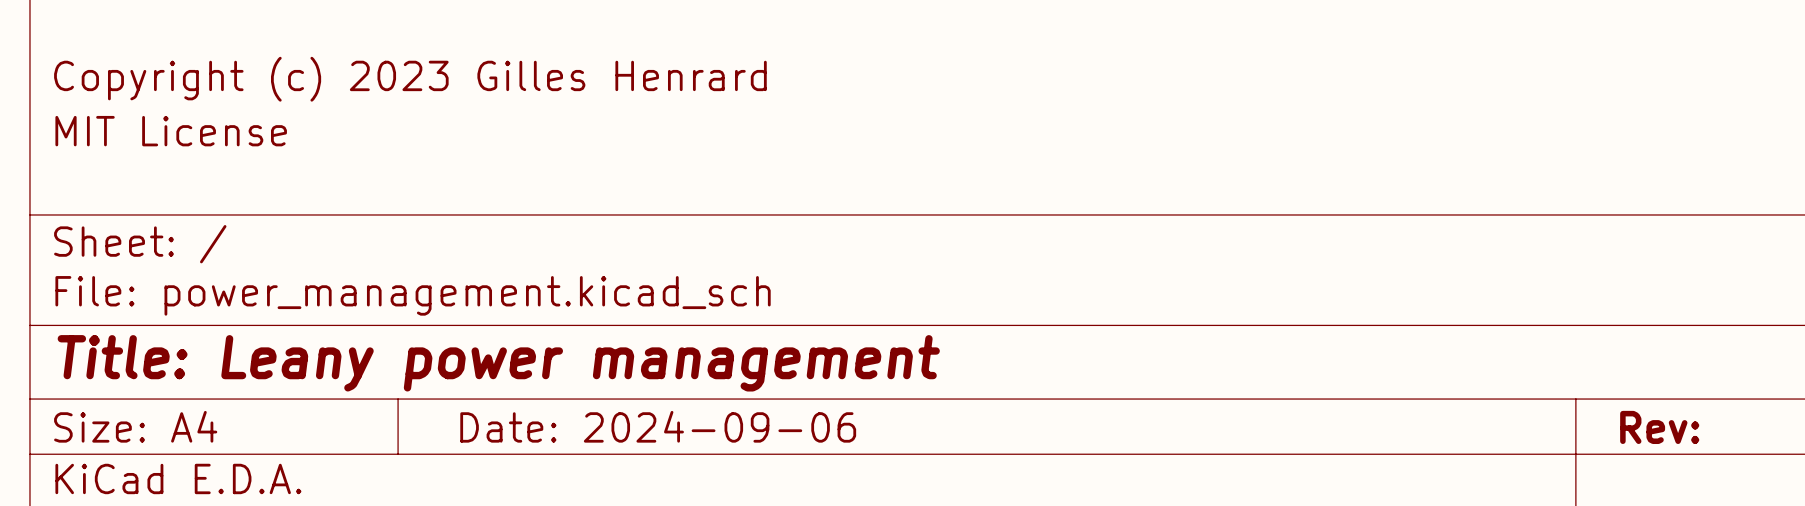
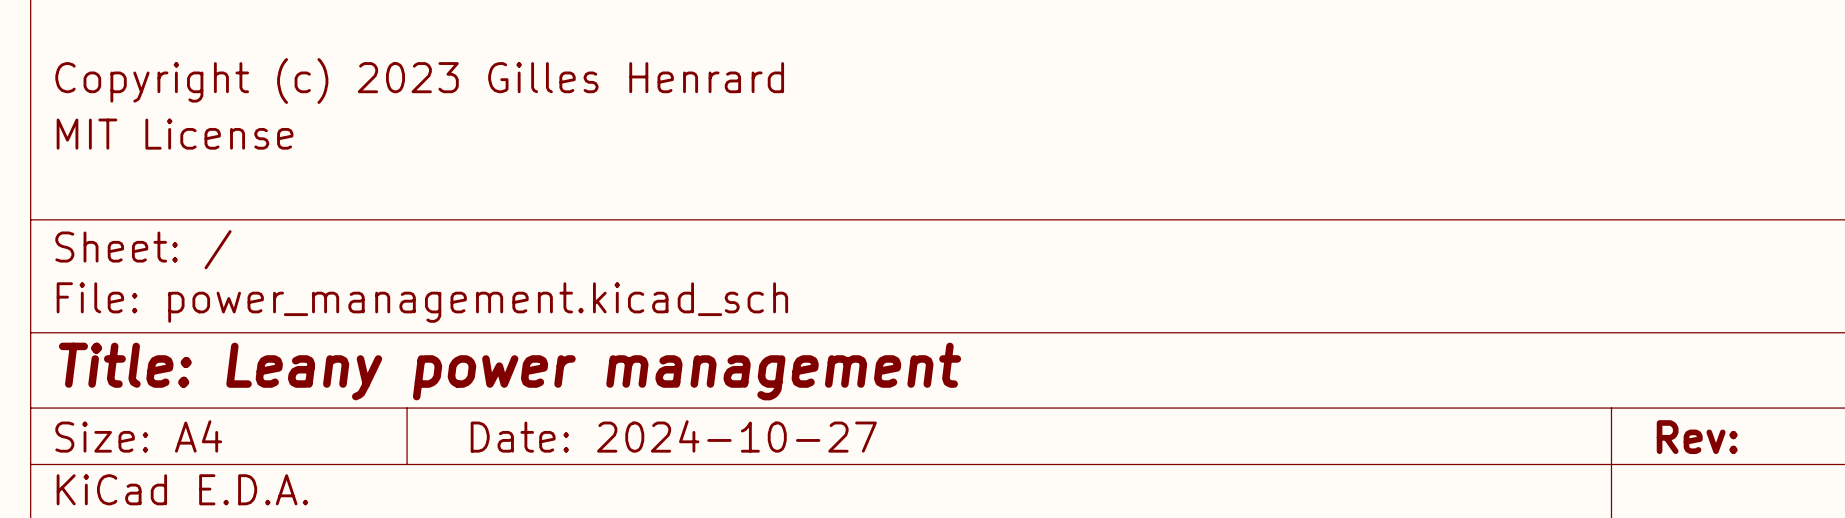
title block: Date: 2024-09-06 (658, 426) -> Date: 2024-10-27 (673, 436)

